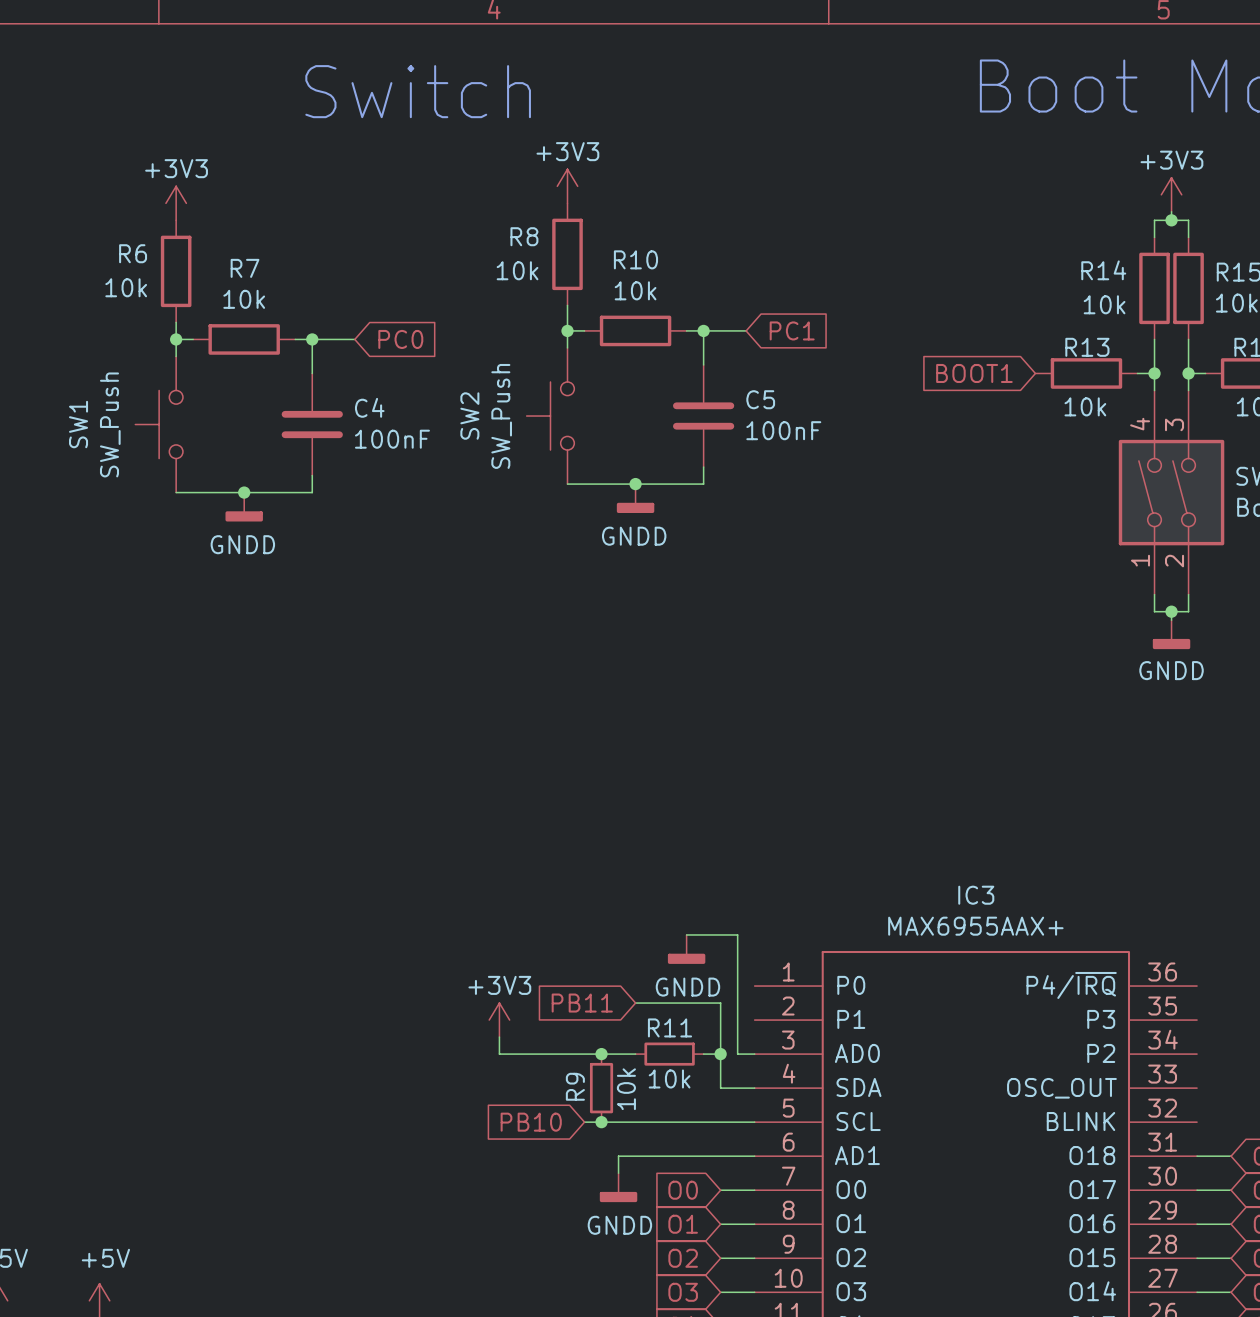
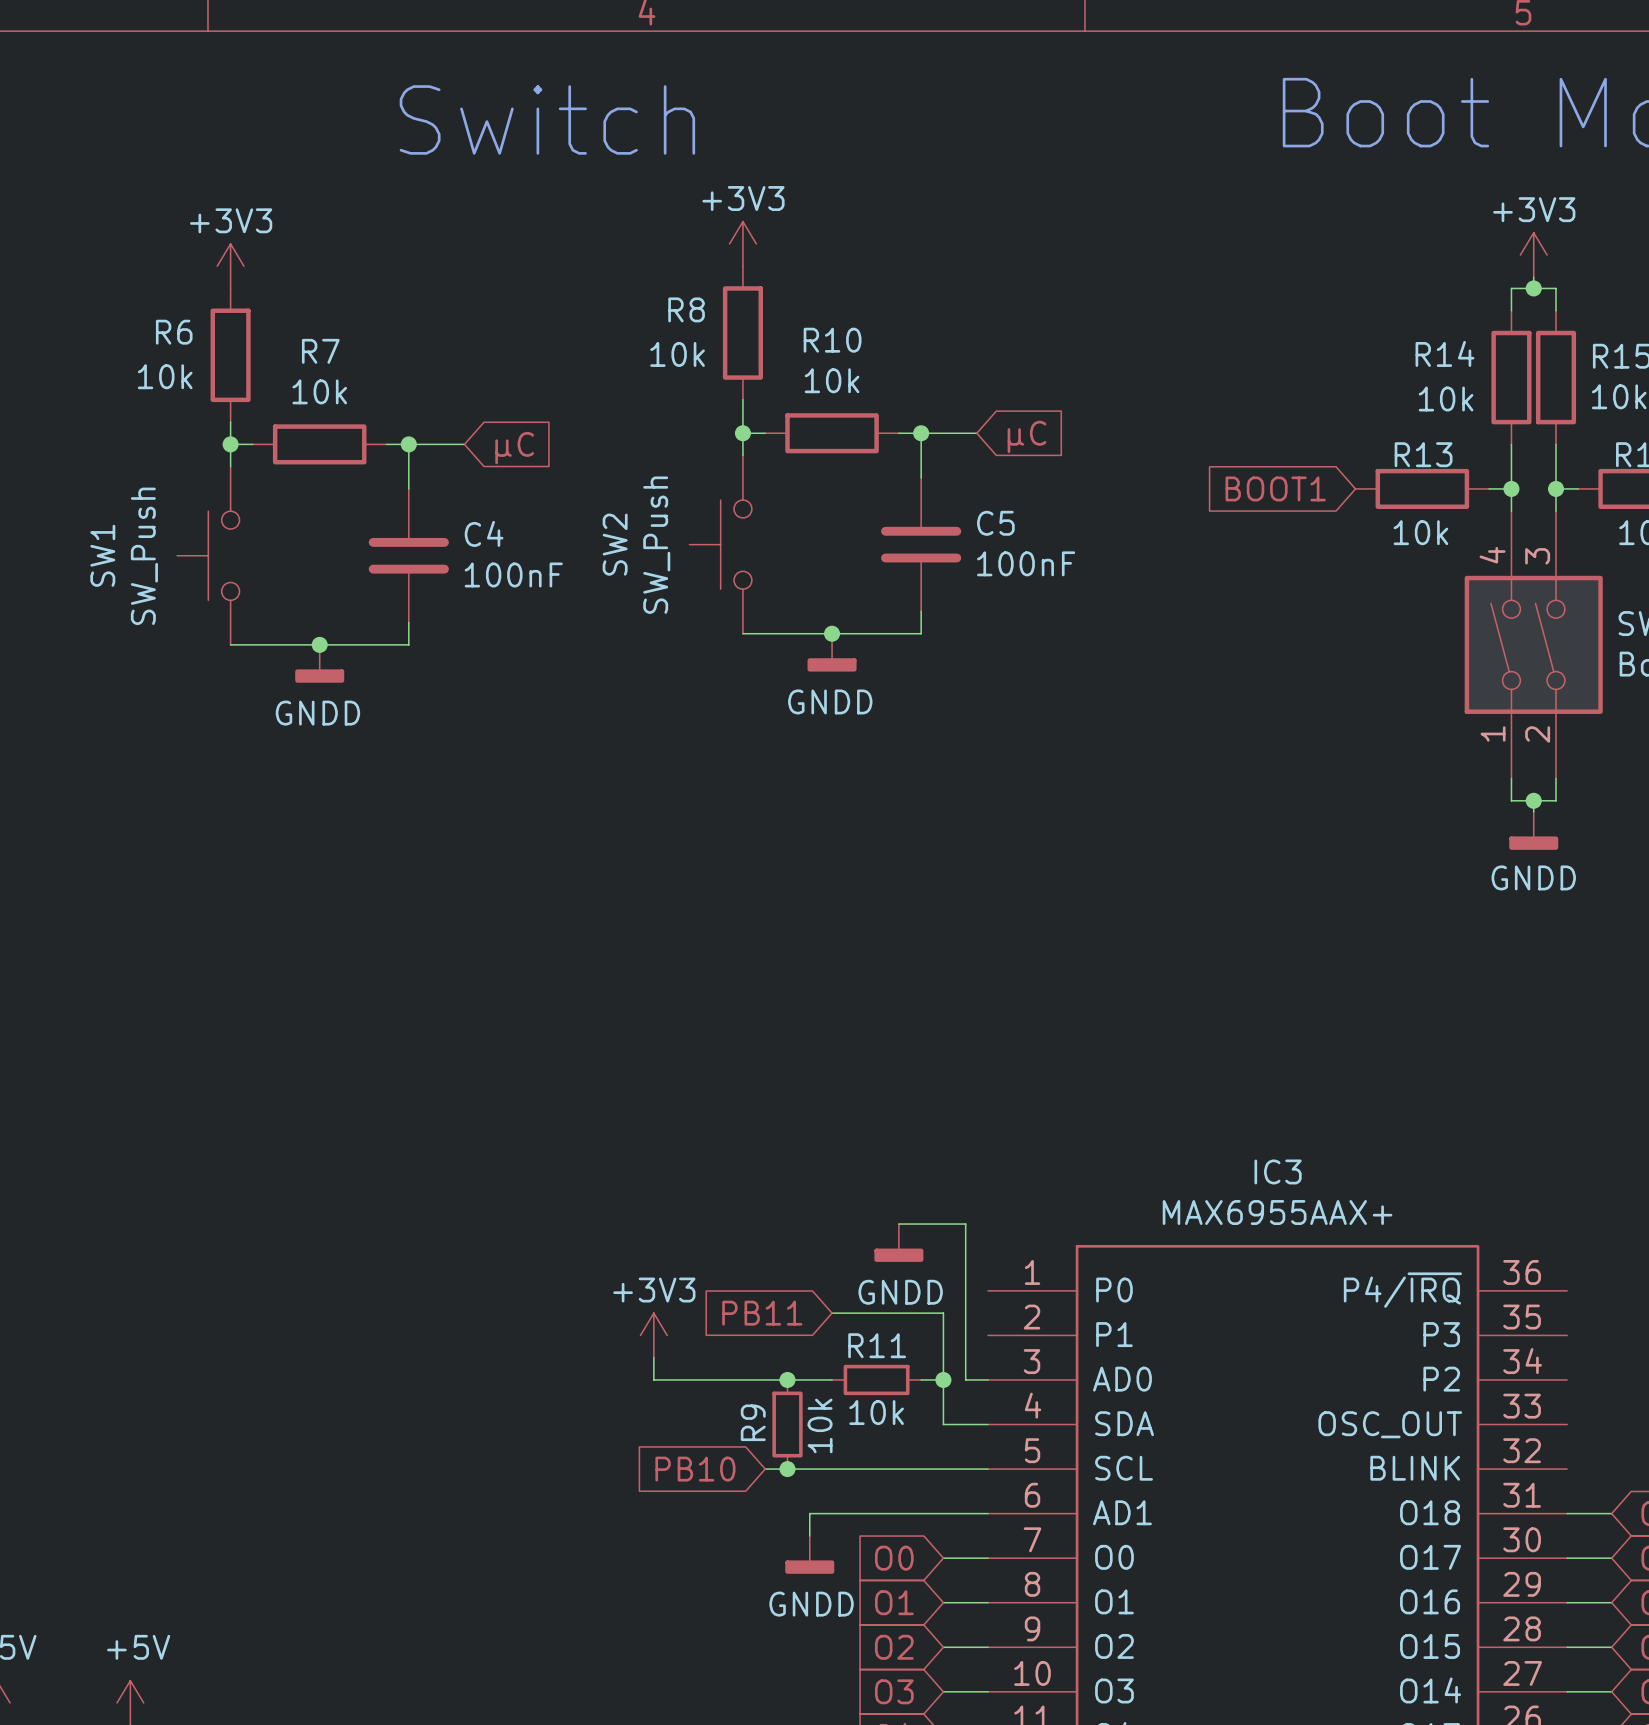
global label: PC1 (792, 330) -> µC (1026, 436)
global label: PC0 (400, 339) -> µC (514, 448)

